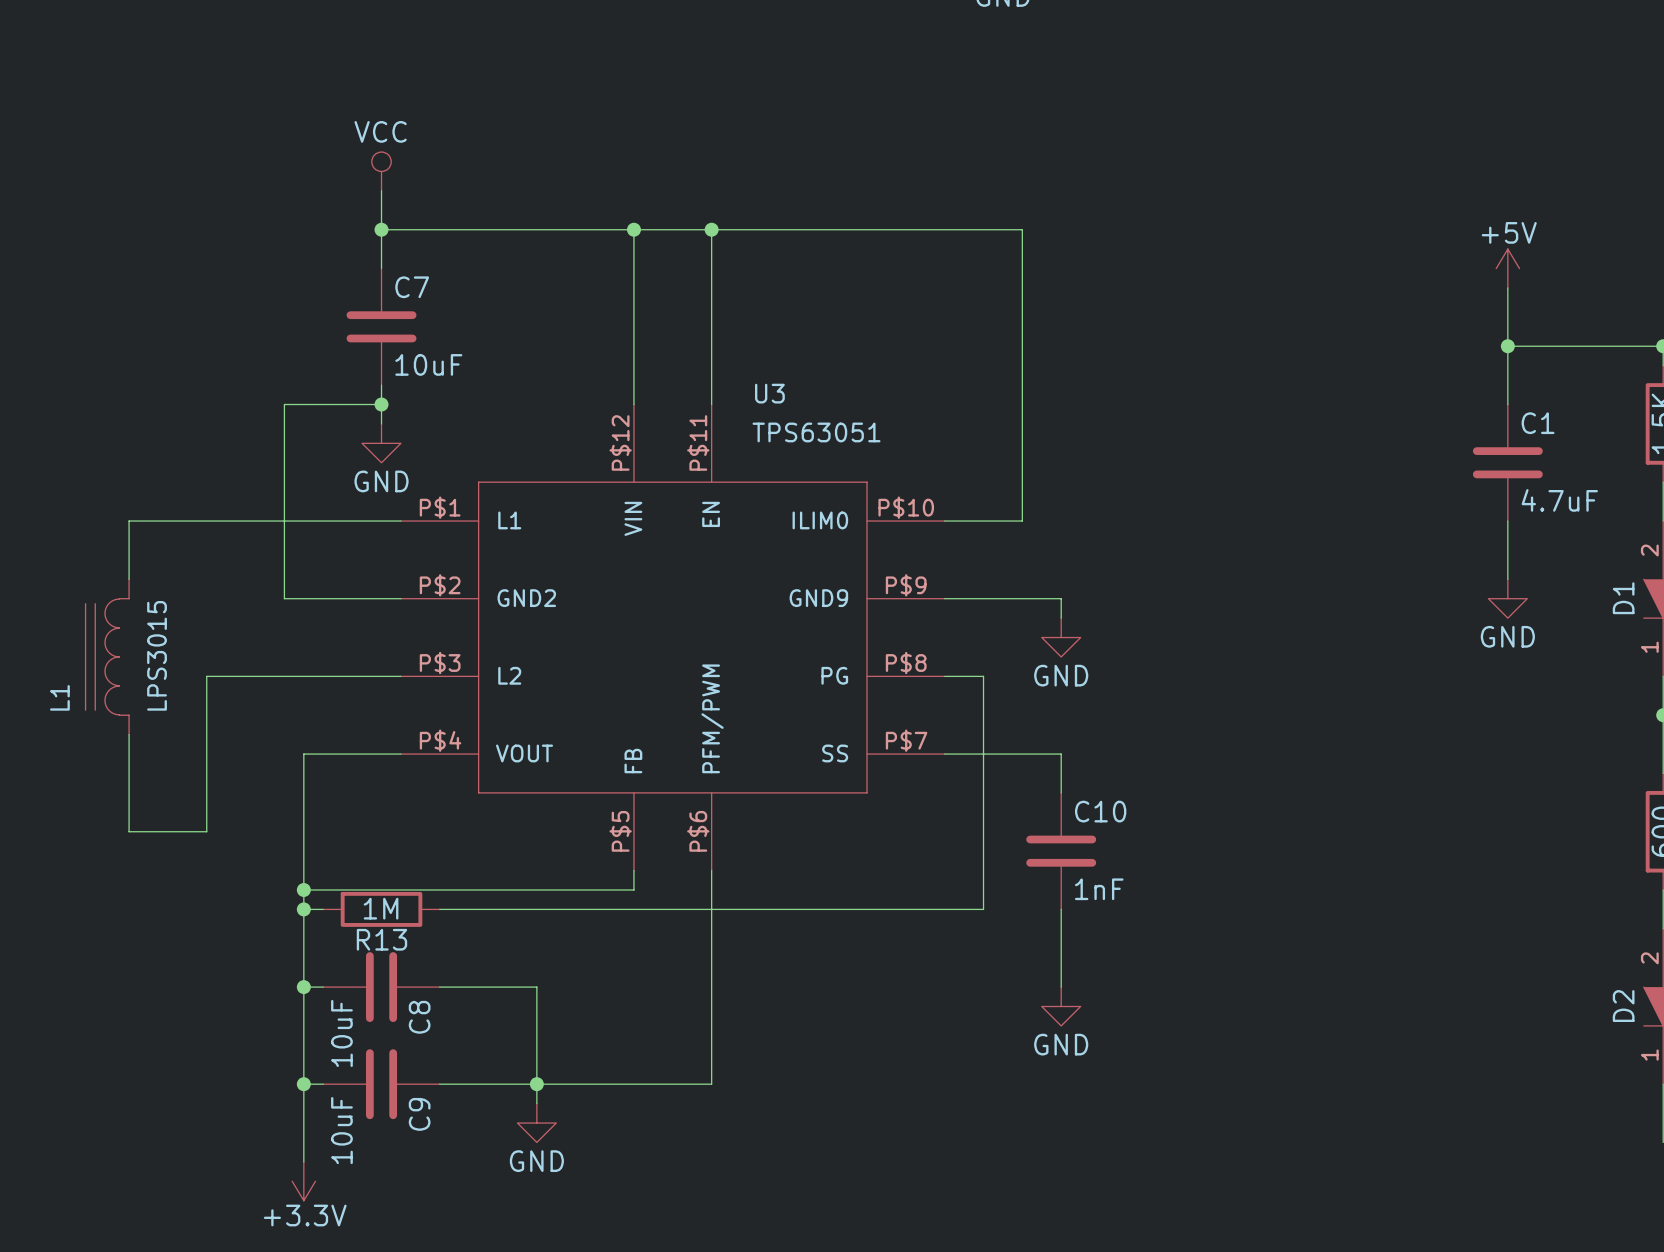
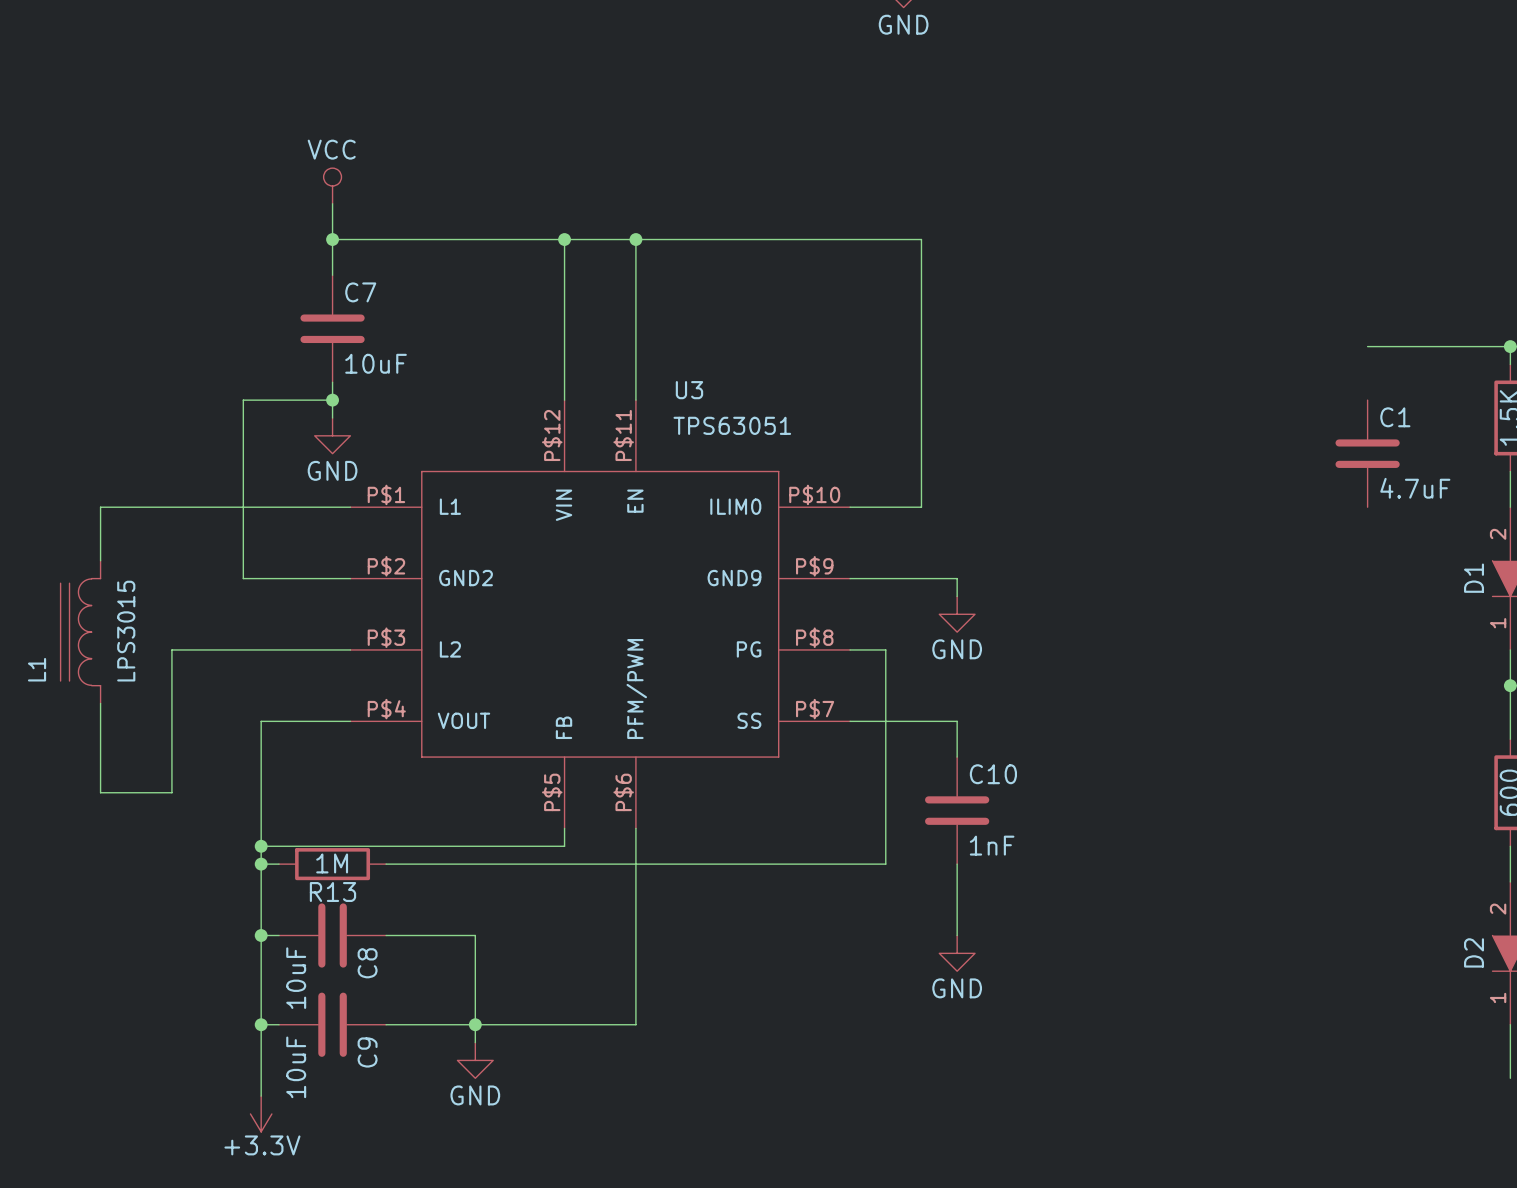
power symbol: +5V (1507, 268) -> none
wire: (1507, 287) (1507, 404) -> none
junction: (1507, 346) -> none
wire: (1507, 521) (1507, 579) -> none
power symbol: GND (1507, 598) -> none

